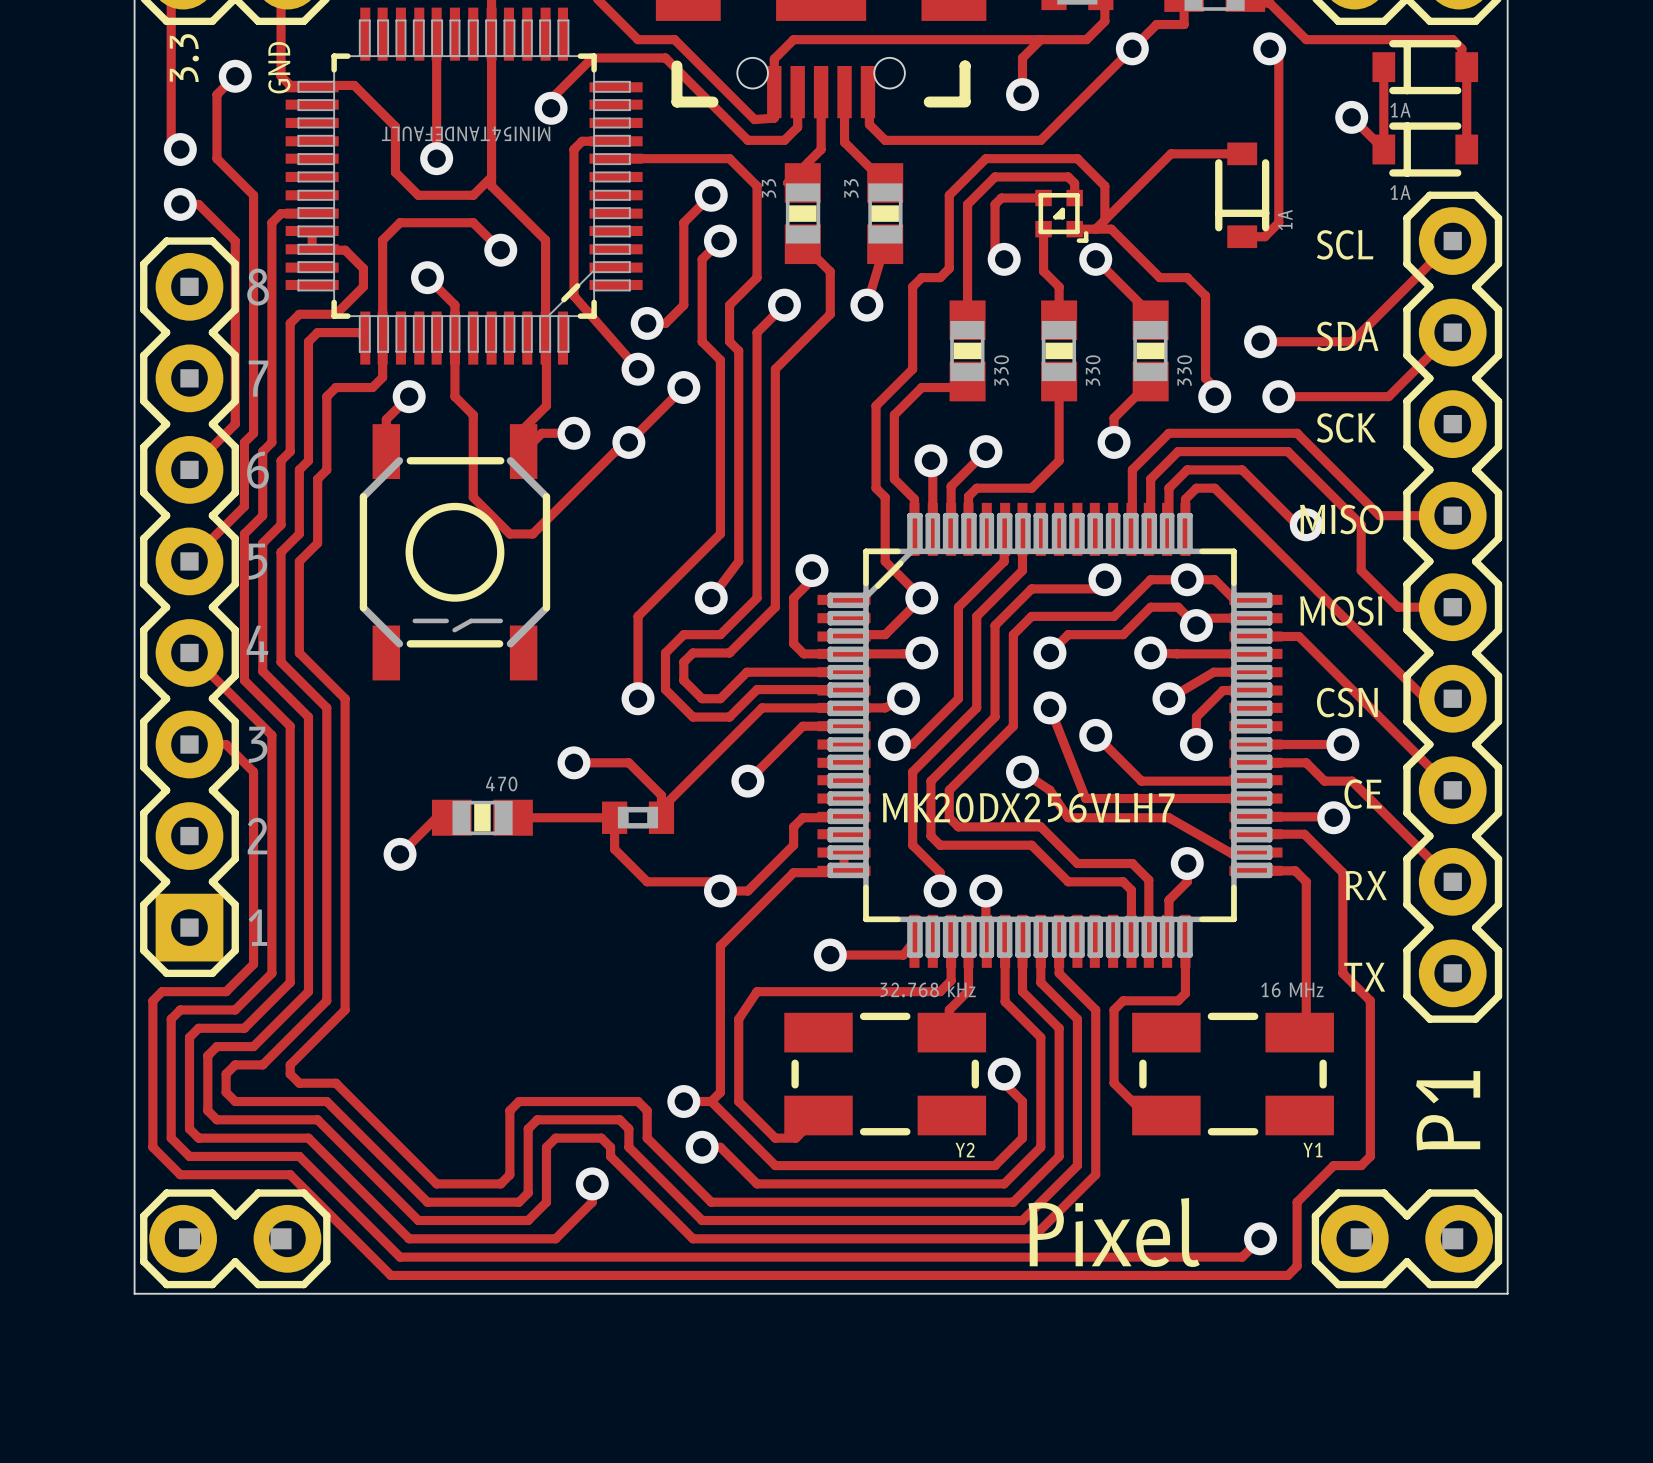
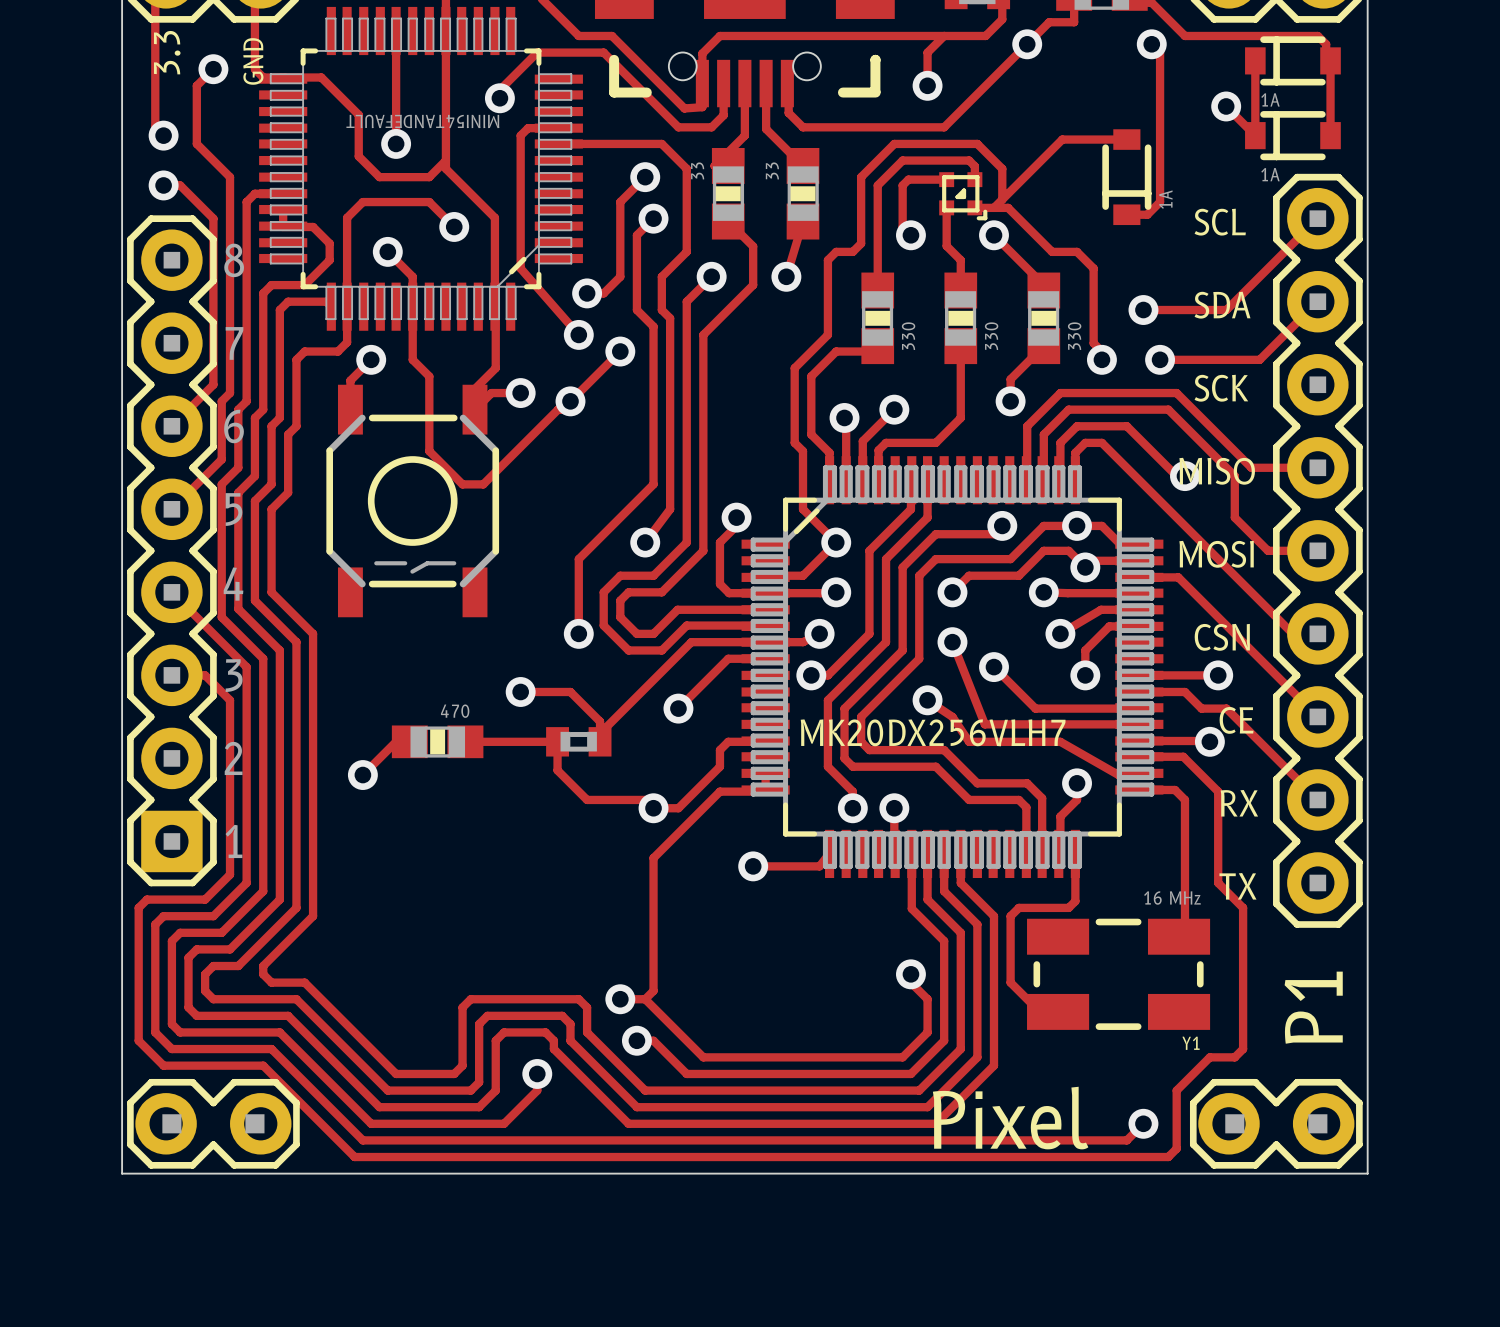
track: (951, 941) (951, 980) (940, 991) (757, 991) (738, 1019) (738, 1101) (775, 1138) (795, 1138) (818, 1115) -> none
track: (968, 941) (968, 990) (949, 1009) (949, 1035) (951, 1032) -> none
Y2: 32.768 kHz (885, 1074) -> none

